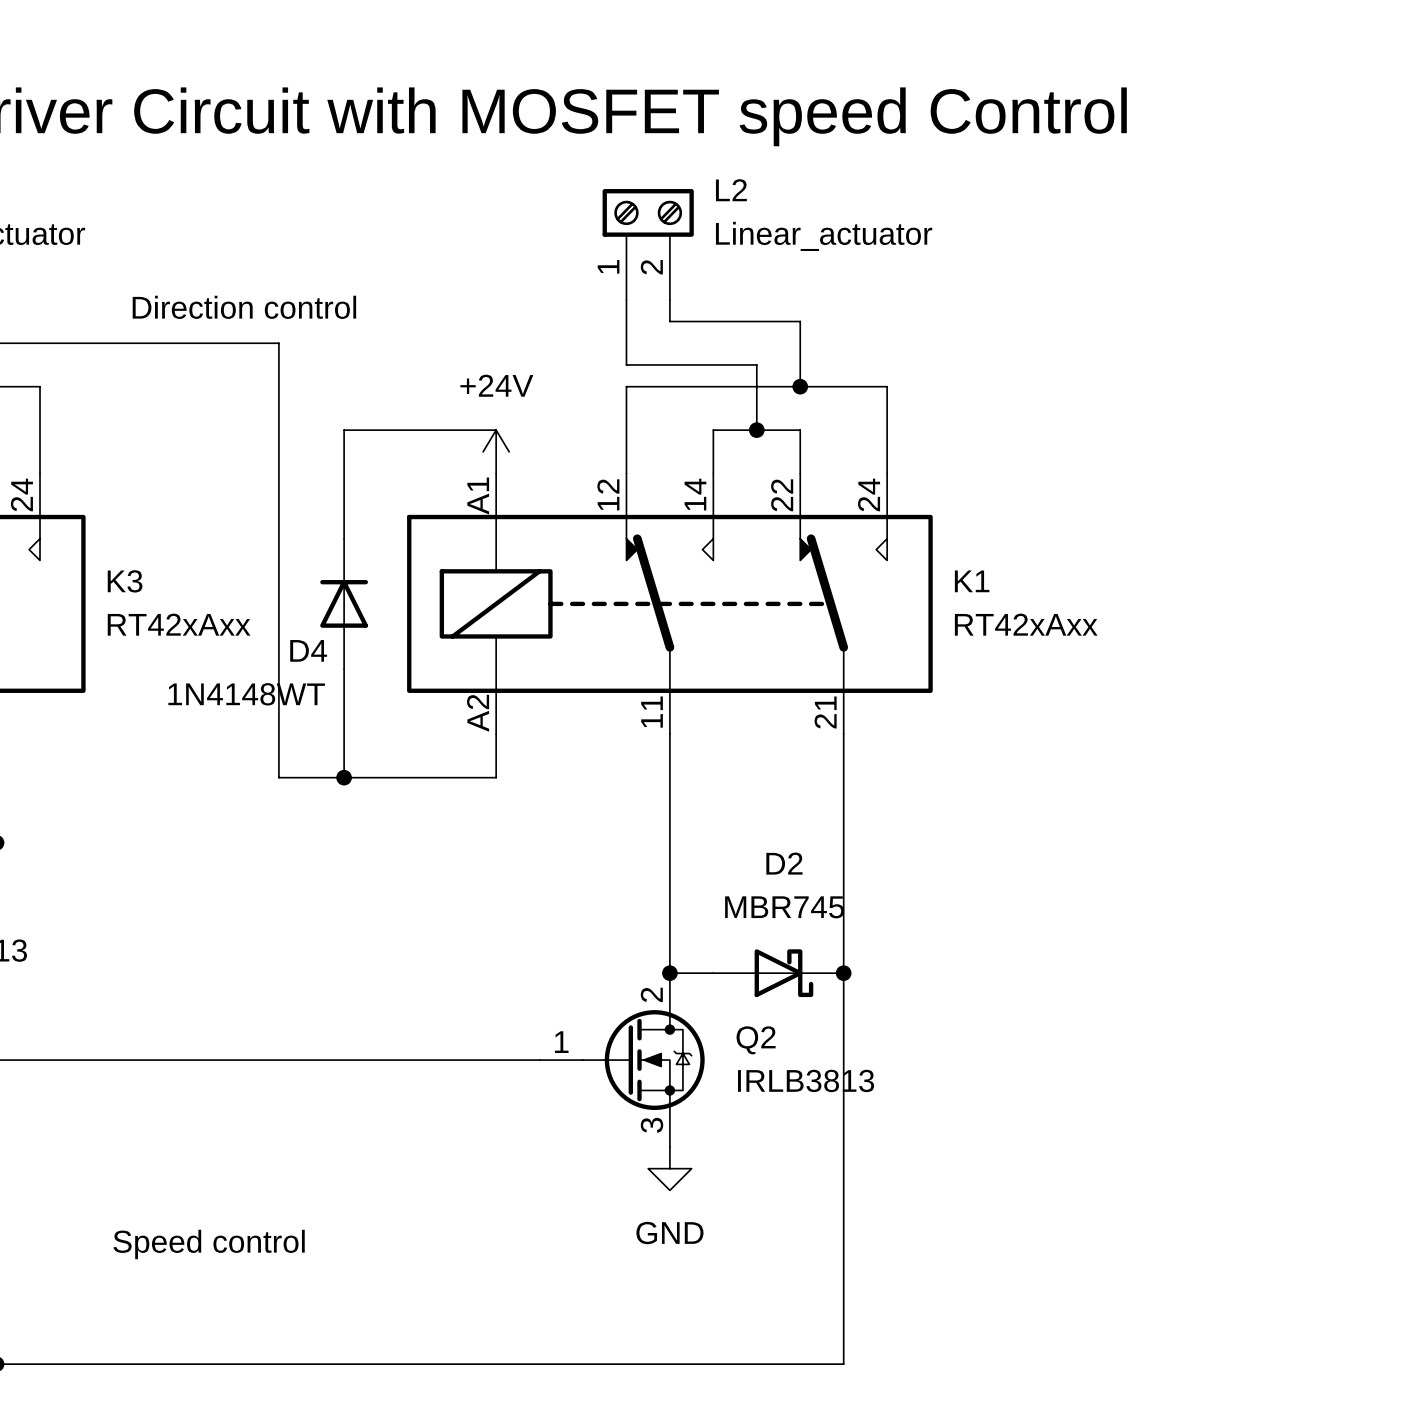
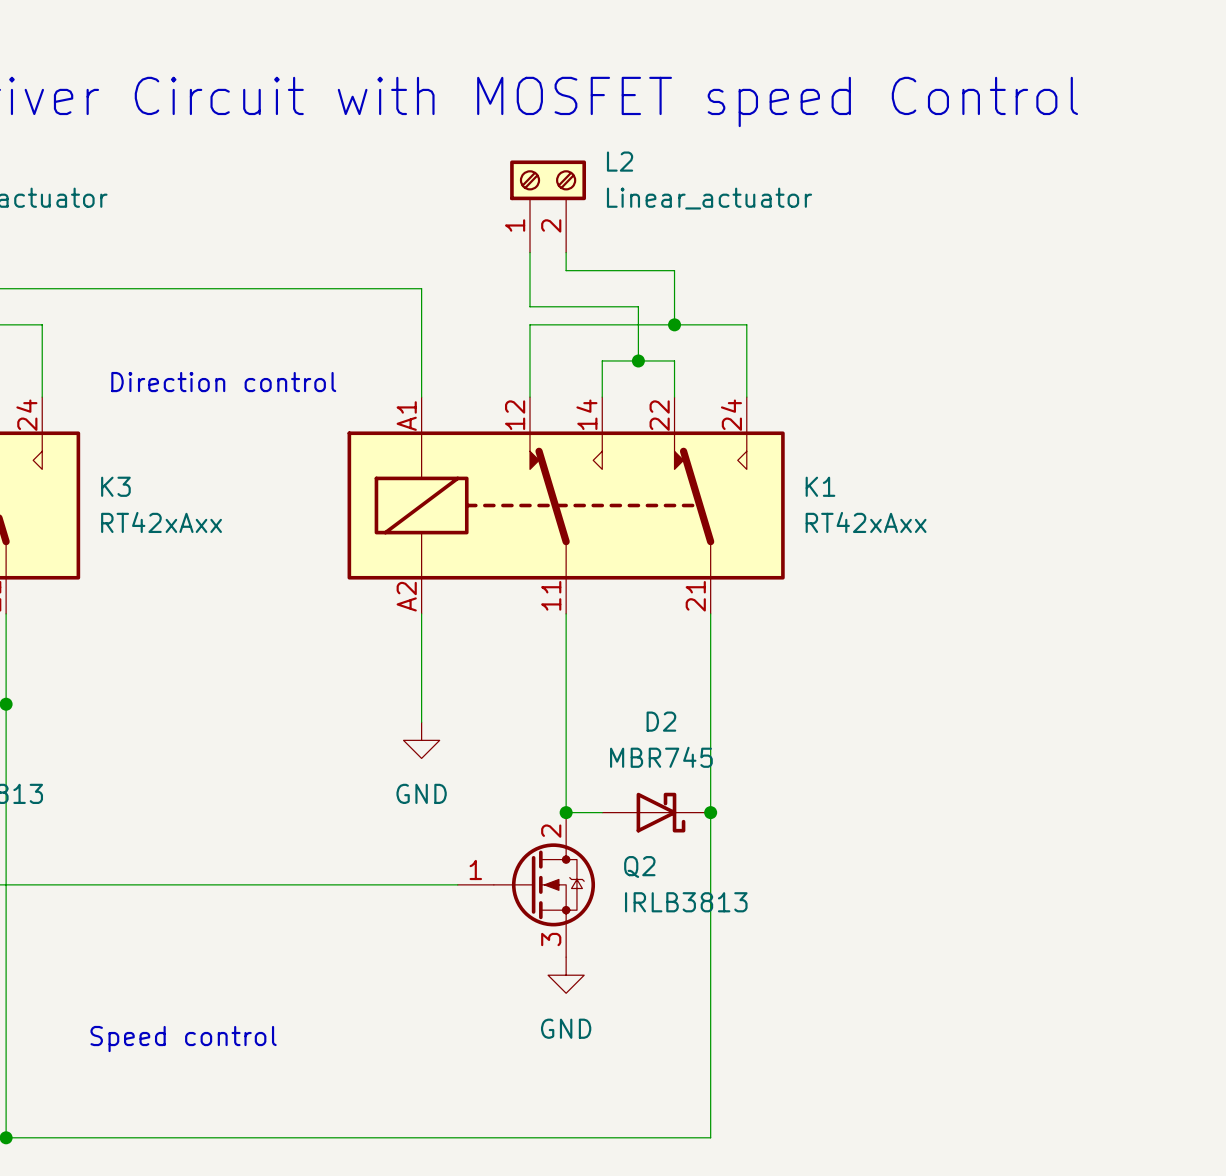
text position: Direction control (244, 307) -> Direction control (223, 382)
wire: (278, 343) (278, 777) (496, 777) -> (240, 288) (421, 288) (421, 397)
wire: (496, 430) (344, 430) (344, 538) -> none
power symbol: +24V (496, 451) -> none
D4: 1N4148WT (344, 603) -> none
wire: (344, 669) (344, 777) -> none
junction: (344, 777) -> none
wire: none -> (421, 650) (421, 722)
power symbol: none -> GND (421, 740)

